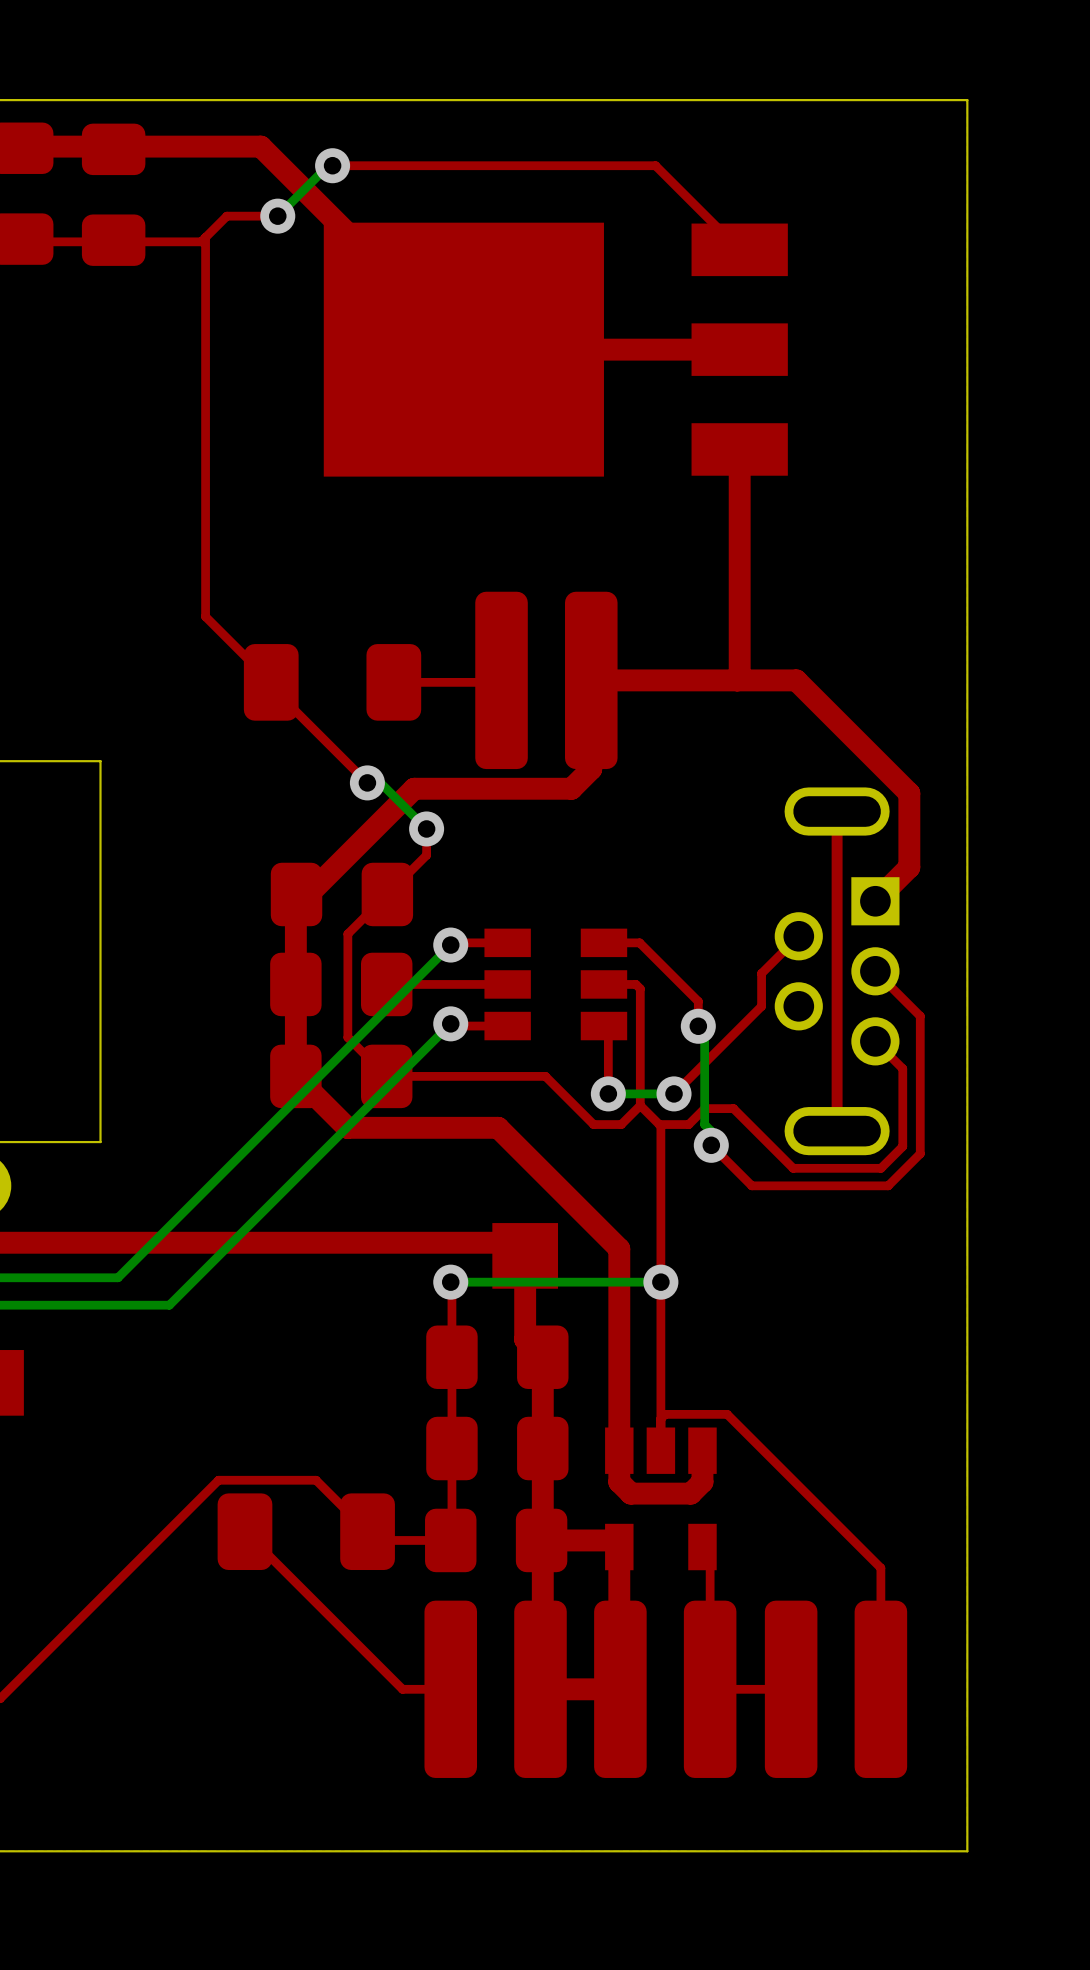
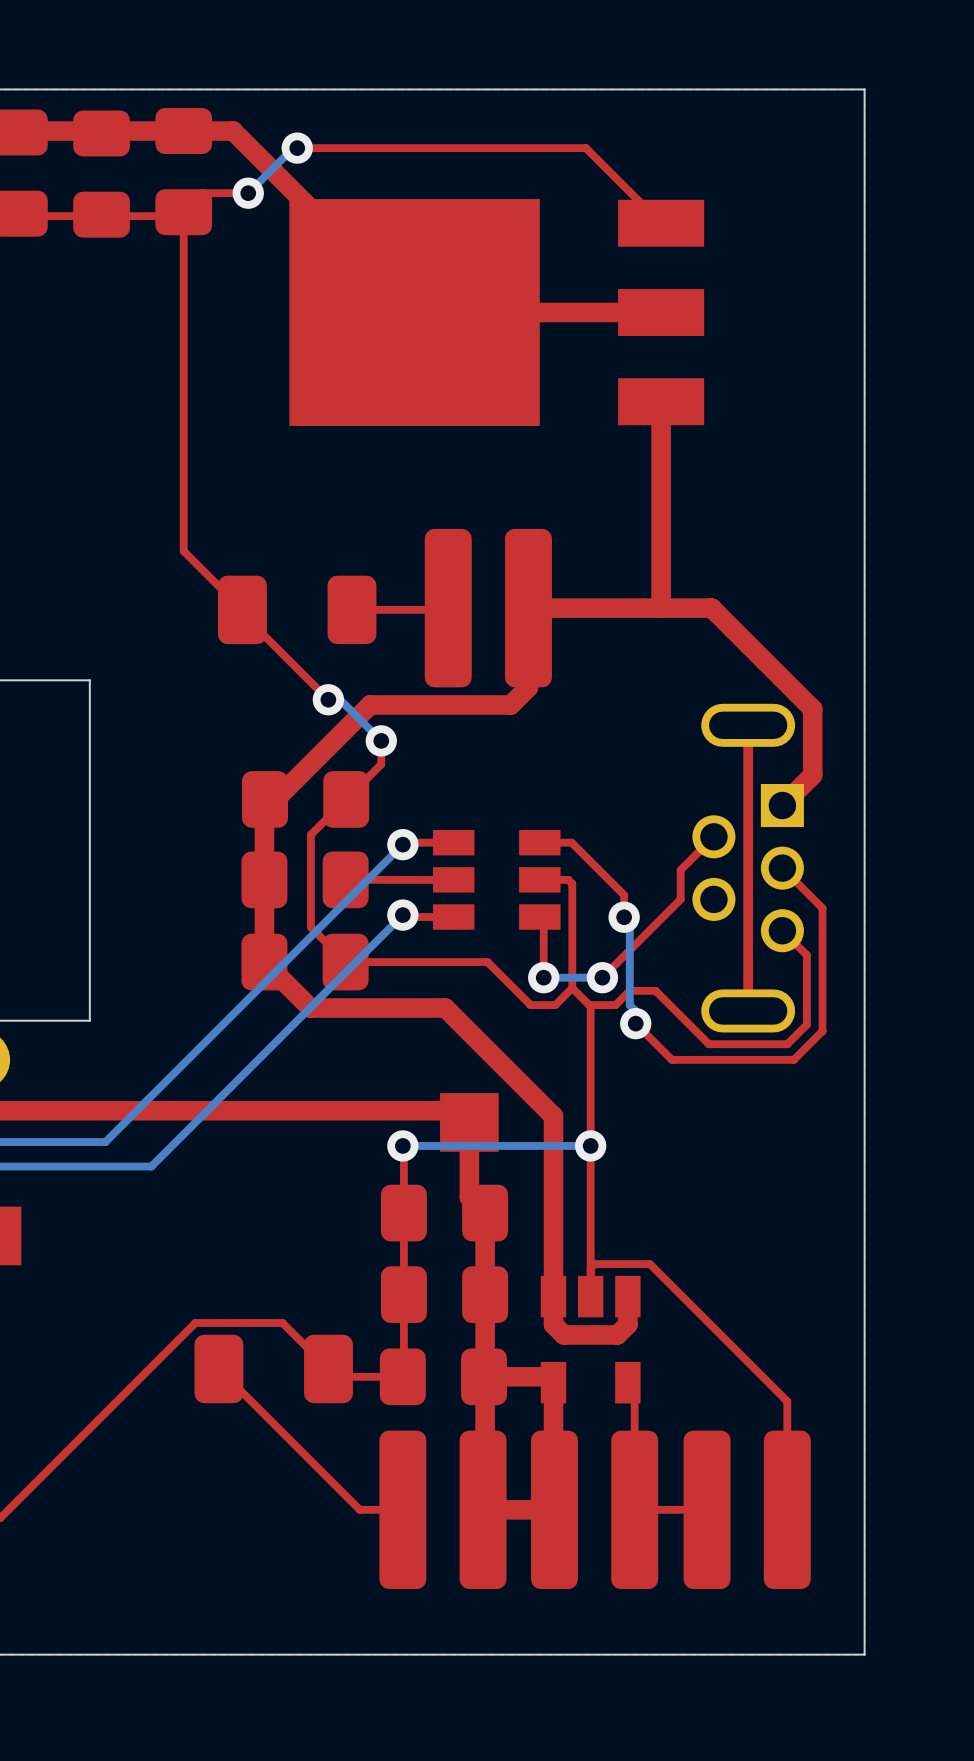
part: none -> (183, 171)

